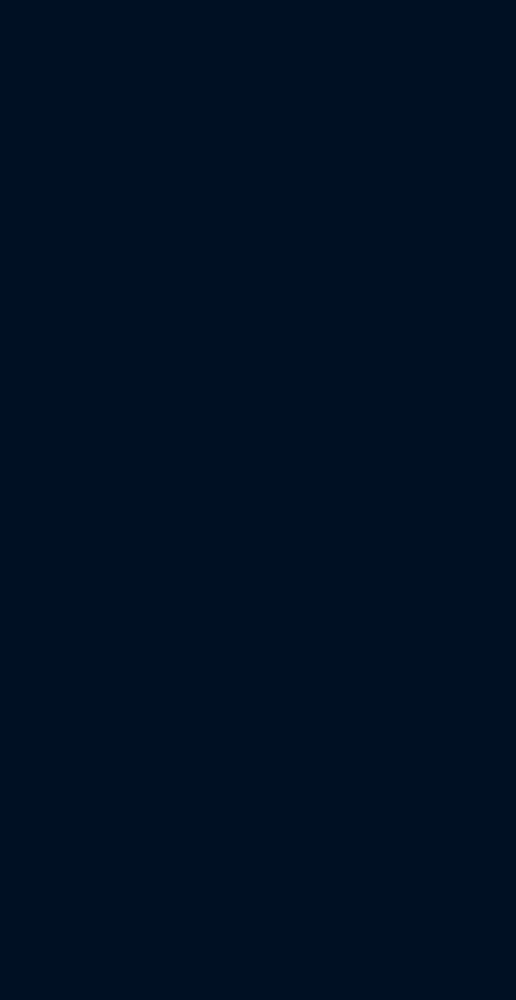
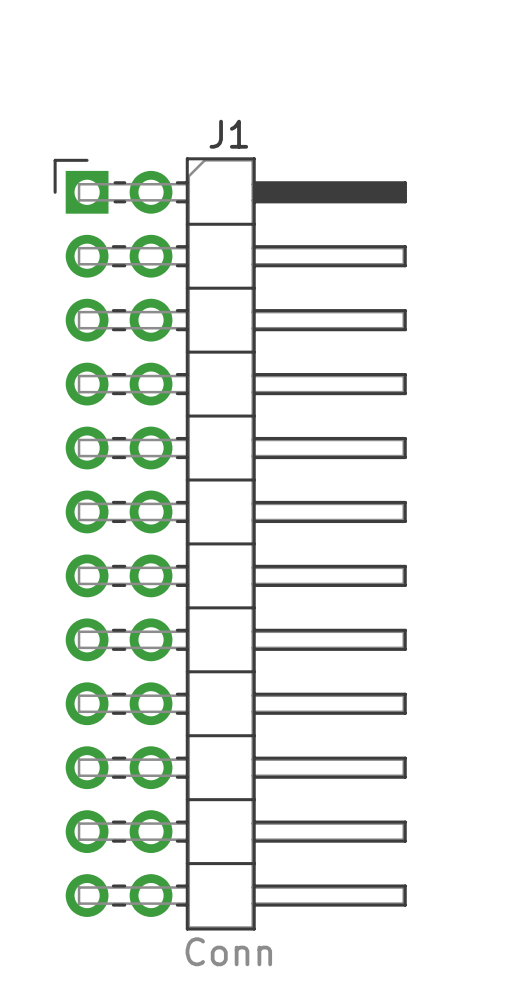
J1: none -> Conn (230, 543)

